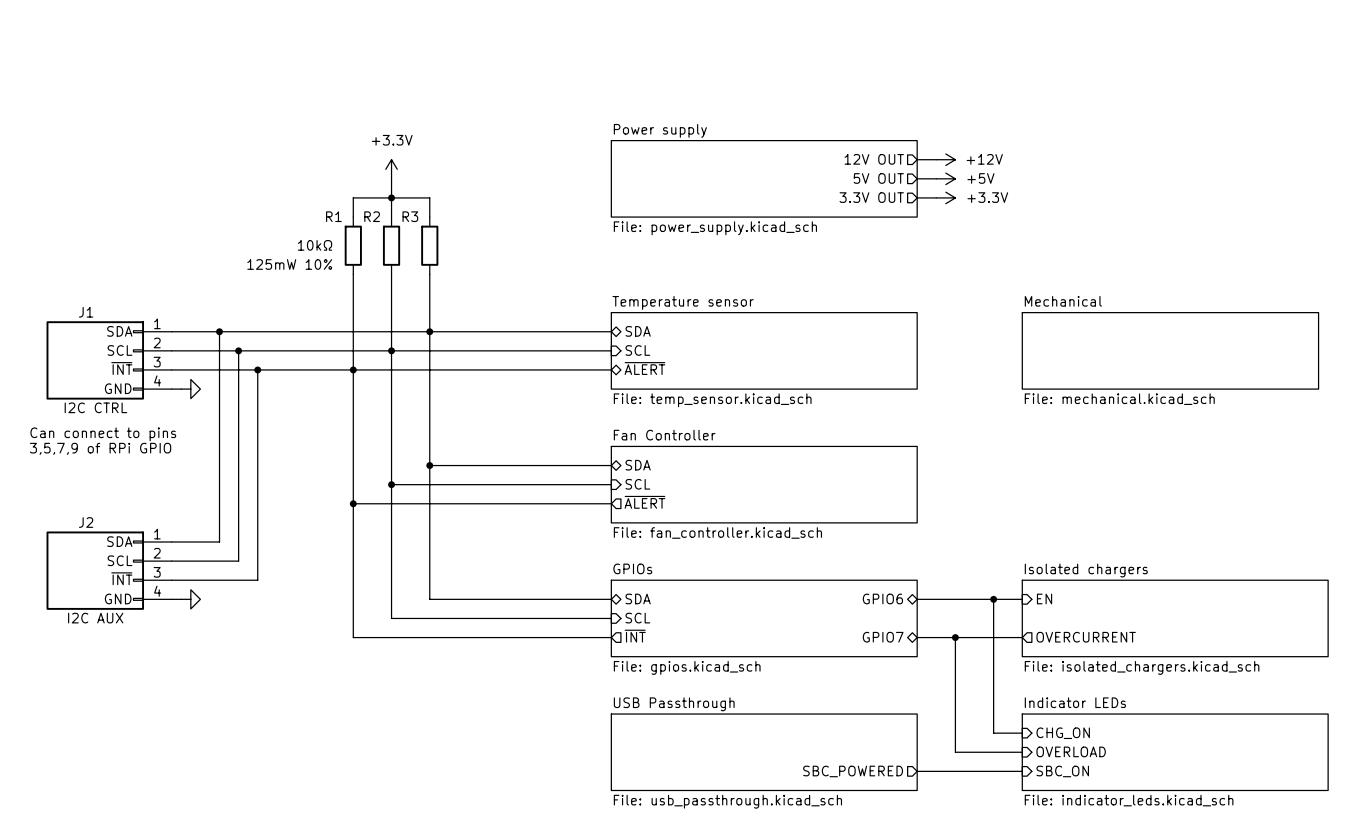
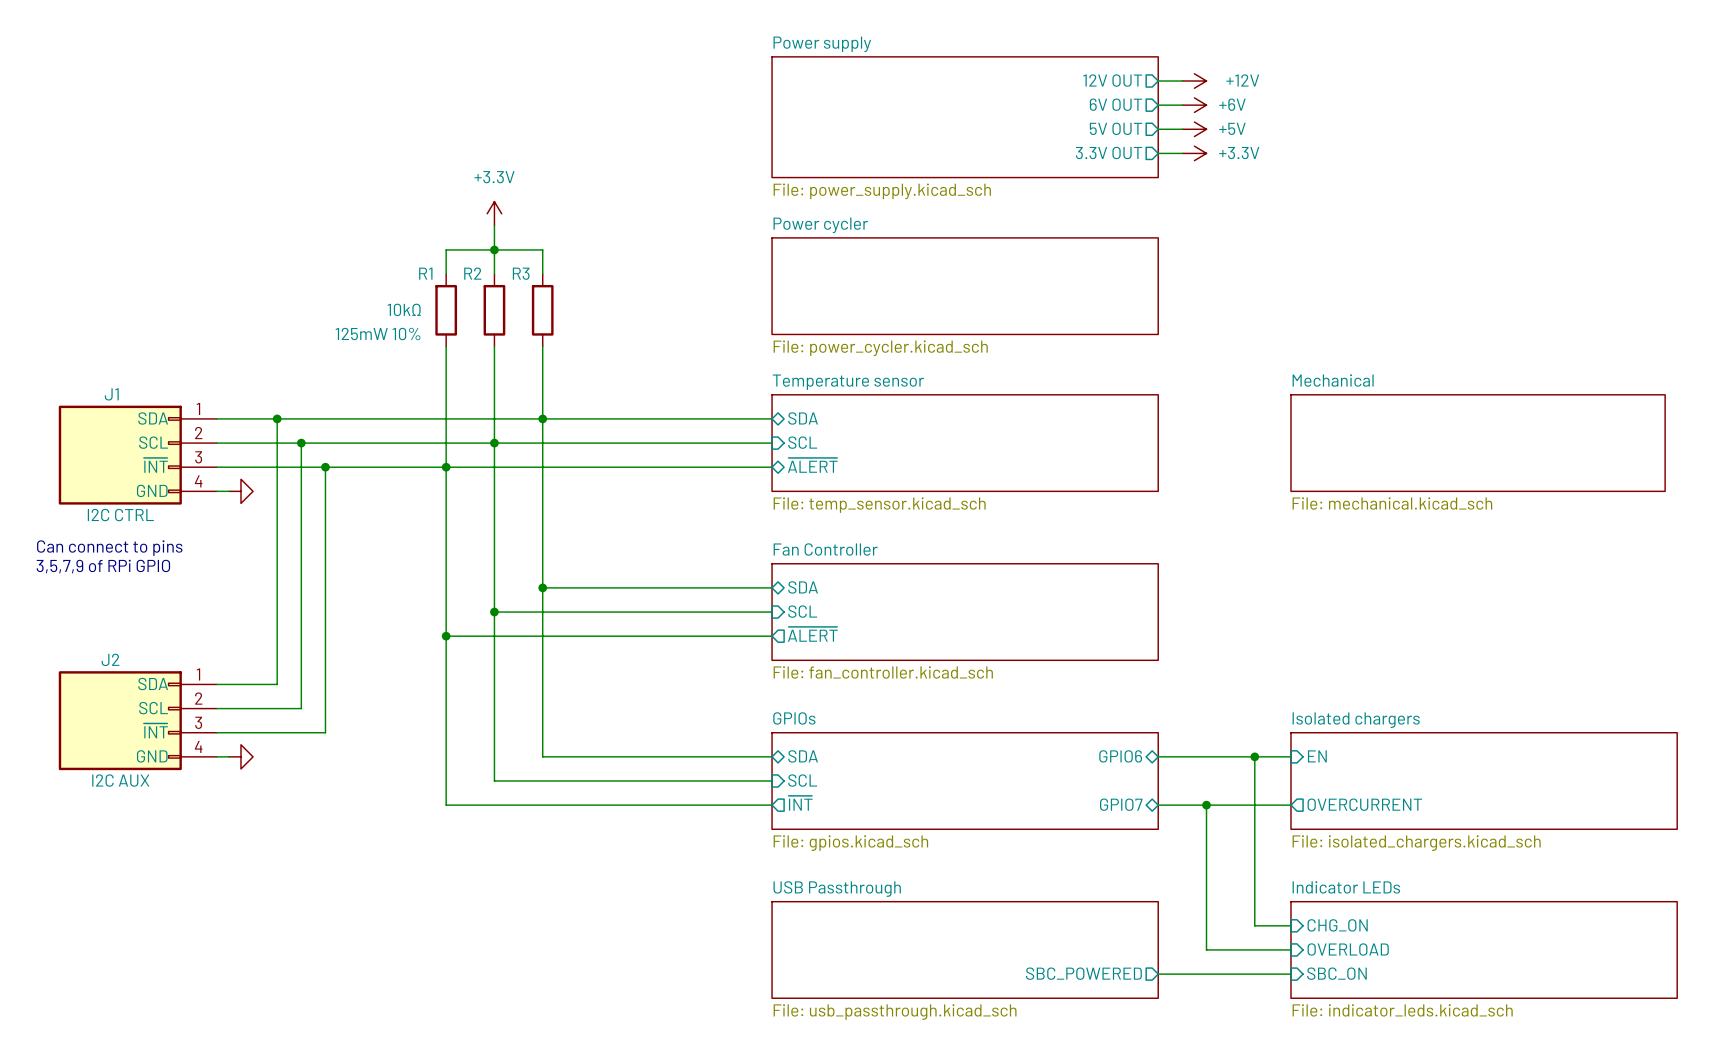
wire: none -> (1158, 81) (1182, 81)
sheet pin: none -> 6V OUT (1115, 104)
power symbol: none -> +6V (1194, 105)
sheet Power supply: none -> File: power_supply.kicad_sch (965, 117)
sheet pin position: 12V OUT (874, 159) -> 12V OUT (1112, 80)
wire: (917, 159) (936, 159) -> (1158, 105) (1182, 105)
power symbol position: +12V (945, 159) -> +12V (1194, 81)
sheet Power supply: File: power_supply.kicad_sch (764, 178) -> none
sheet pin position: 5V OUT (878, 178) -> 5V OUT (1116, 128)
wire: (917, 178) (936, 178) -> (1158, 129) (1182, 129)
power symbol position: +5V (945, 178) -> +5V (1194, 129)
sheet pin position: 3.3V OUT (871, 197) -> 3.3V OUT (1109, 152)
wire: (917, 197) (936, 197) -> (1158, 153) (1182, 153)
power symbol position: +3.3V (945, 197) -> +3.3V (1194, 153)
sheet Power cycler: none -> File: power_cycler.kicad_sch (965, 286)

